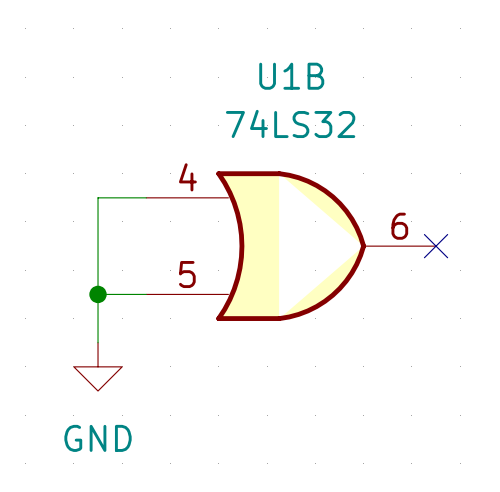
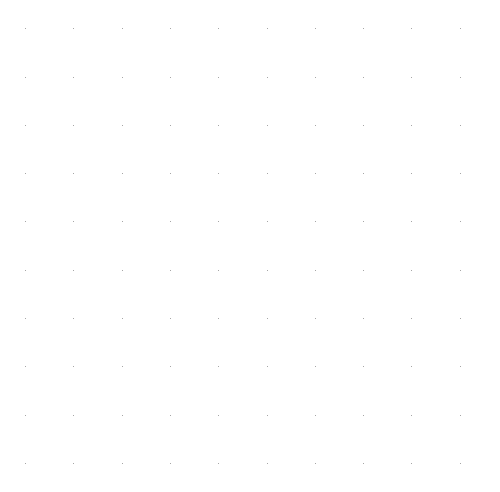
wire: (146, 197) (98, 197) (98, 342) -> none
U1B: 74LS32 (291, 246) -> none
no-connect mark: (436, 246) -> none
wire: (98, 294) (146, 294) -> none
junction: (98, 294) -> none
power symbol: GND (98, 366) -> none

